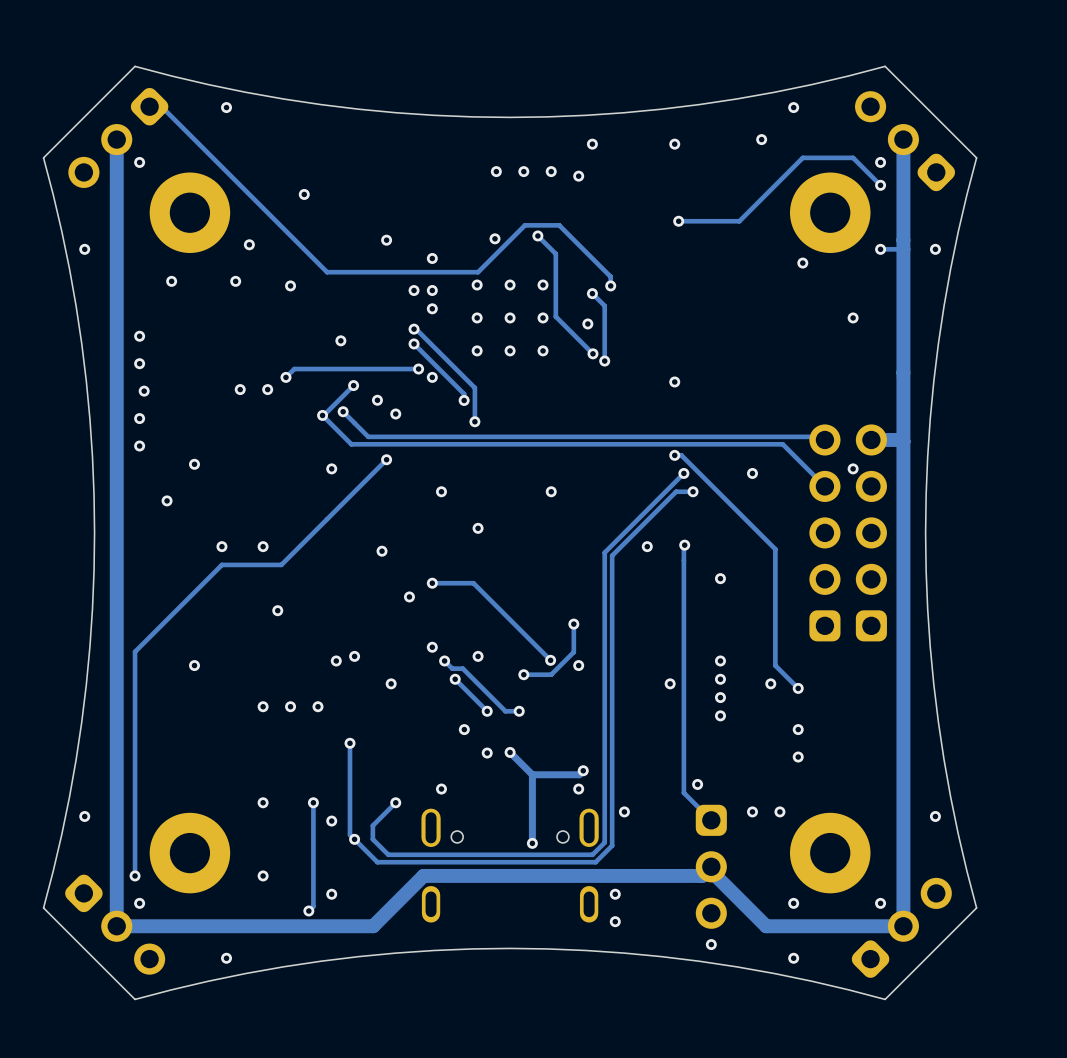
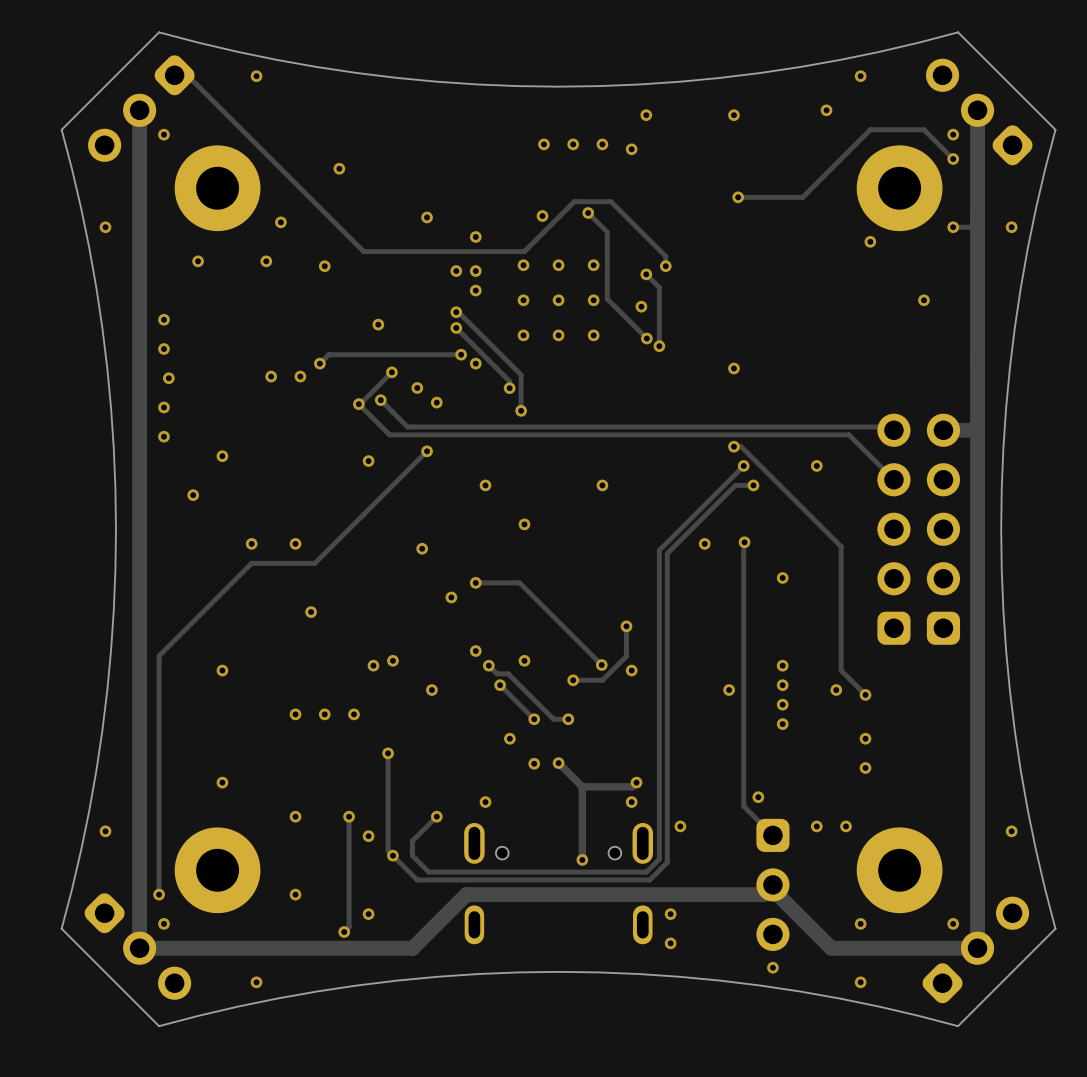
via: (853, 468) -> none
via: none -> (222, 782)

